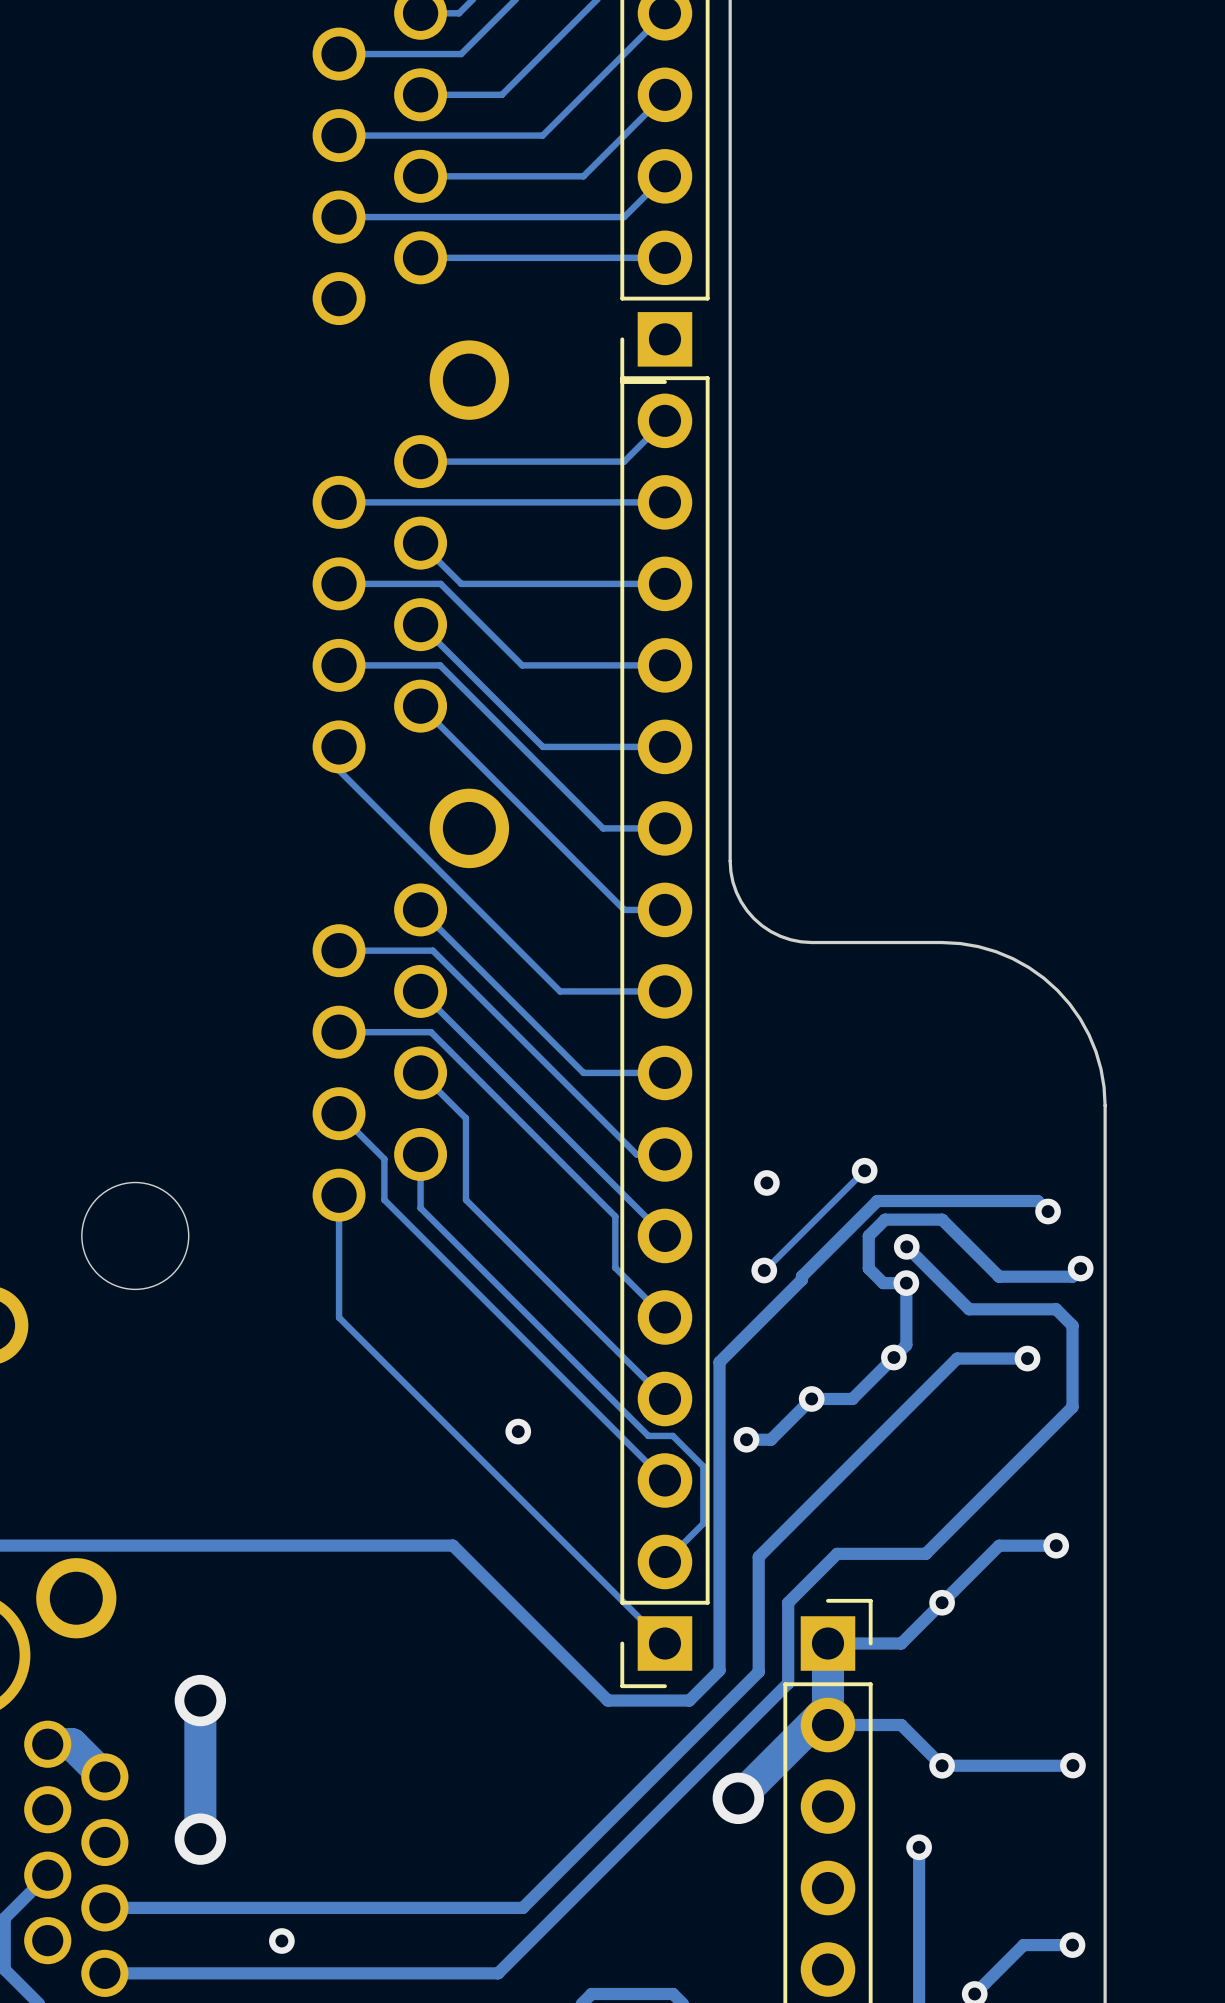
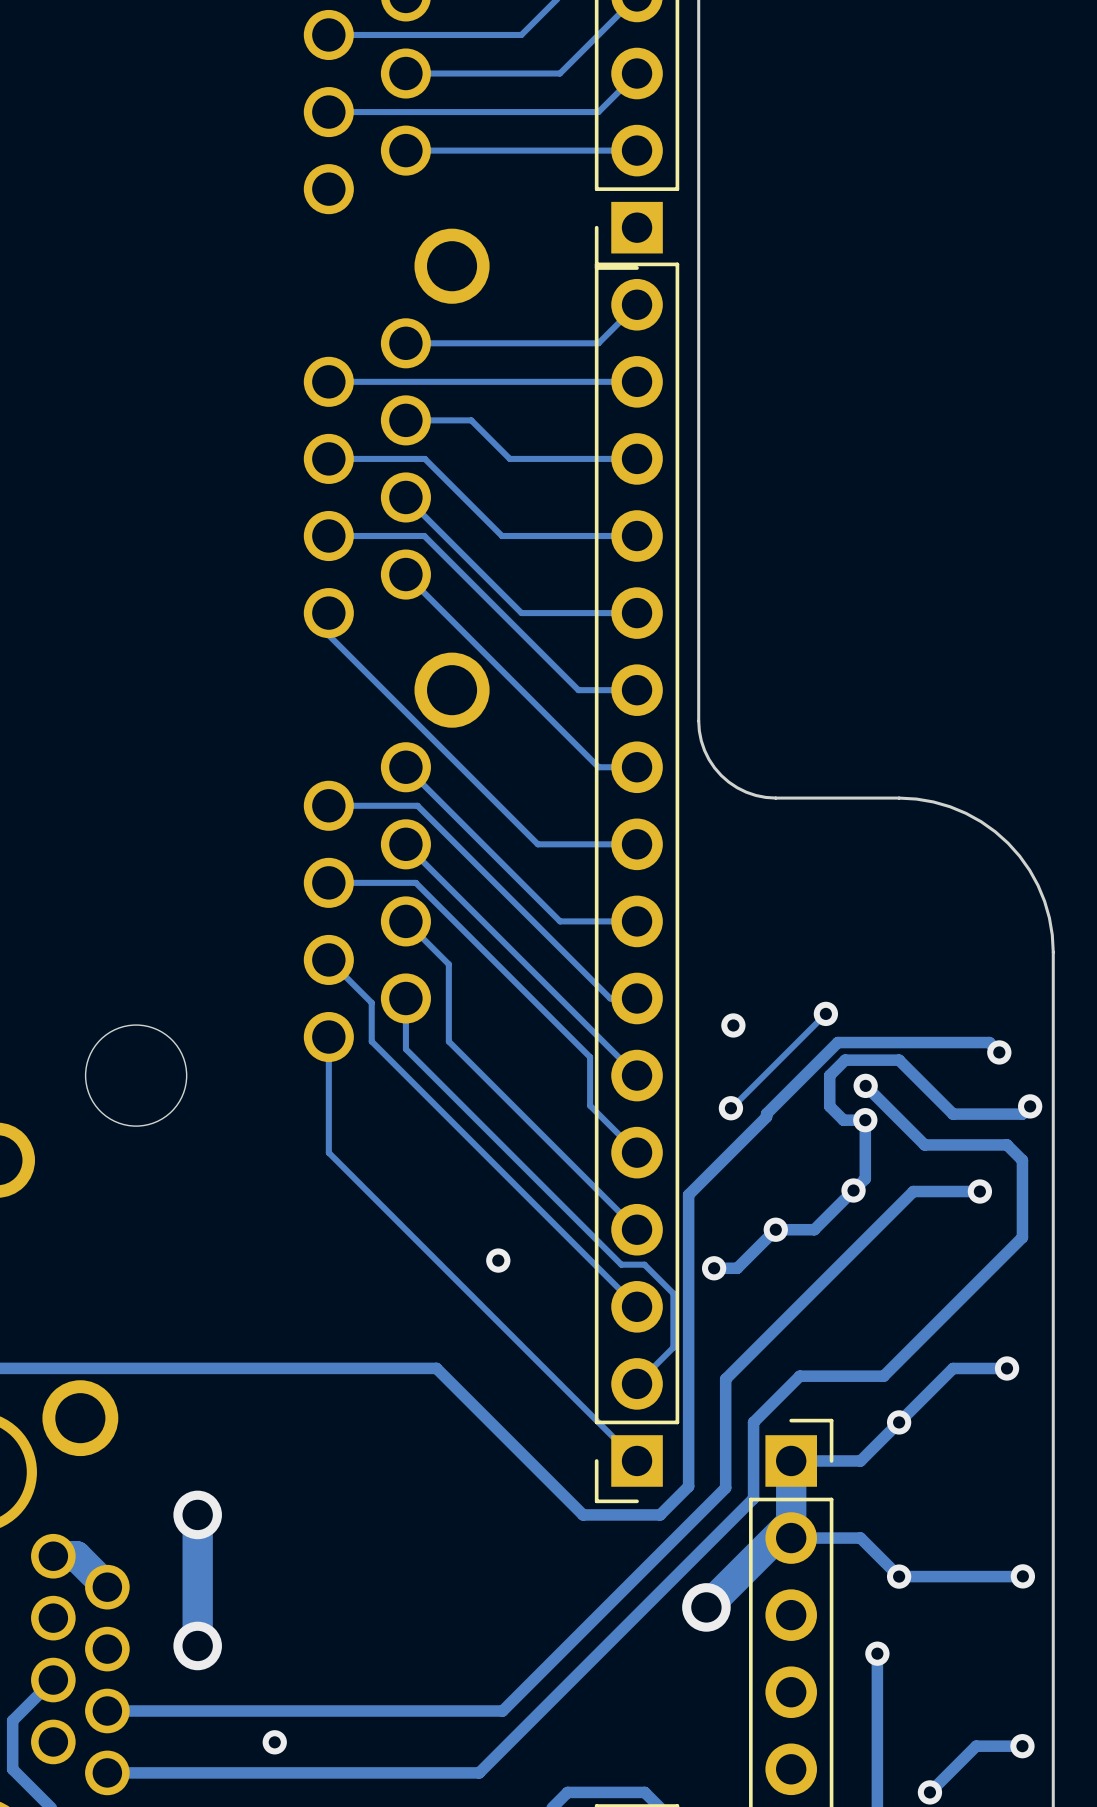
track: (420, 543) (461, 583) (530, 583) -> (405, 420) (471, 420) (509, 458)

